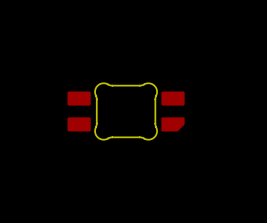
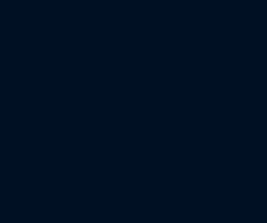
part: (126, 111) -> none

